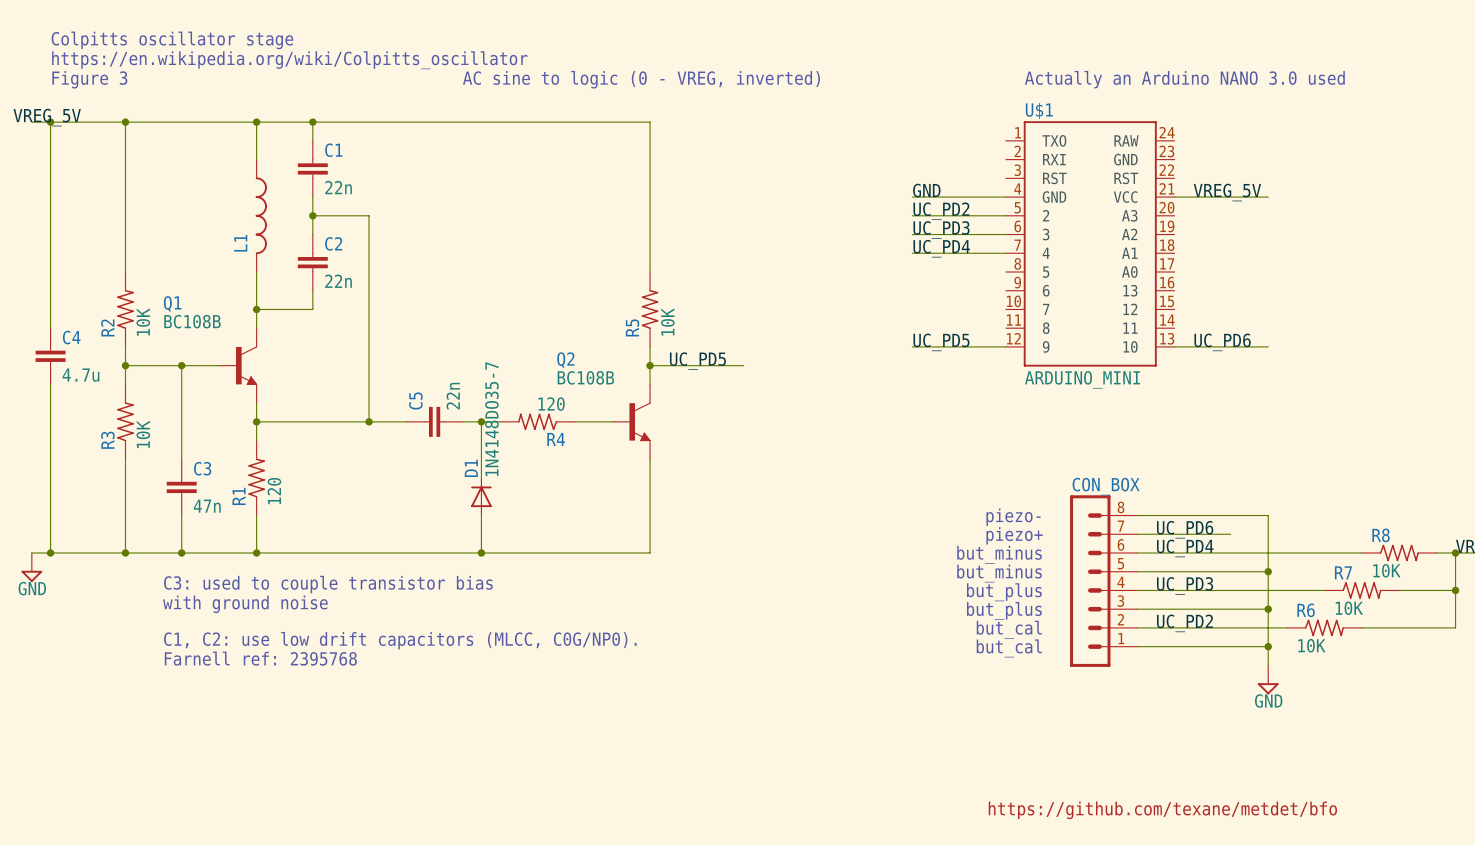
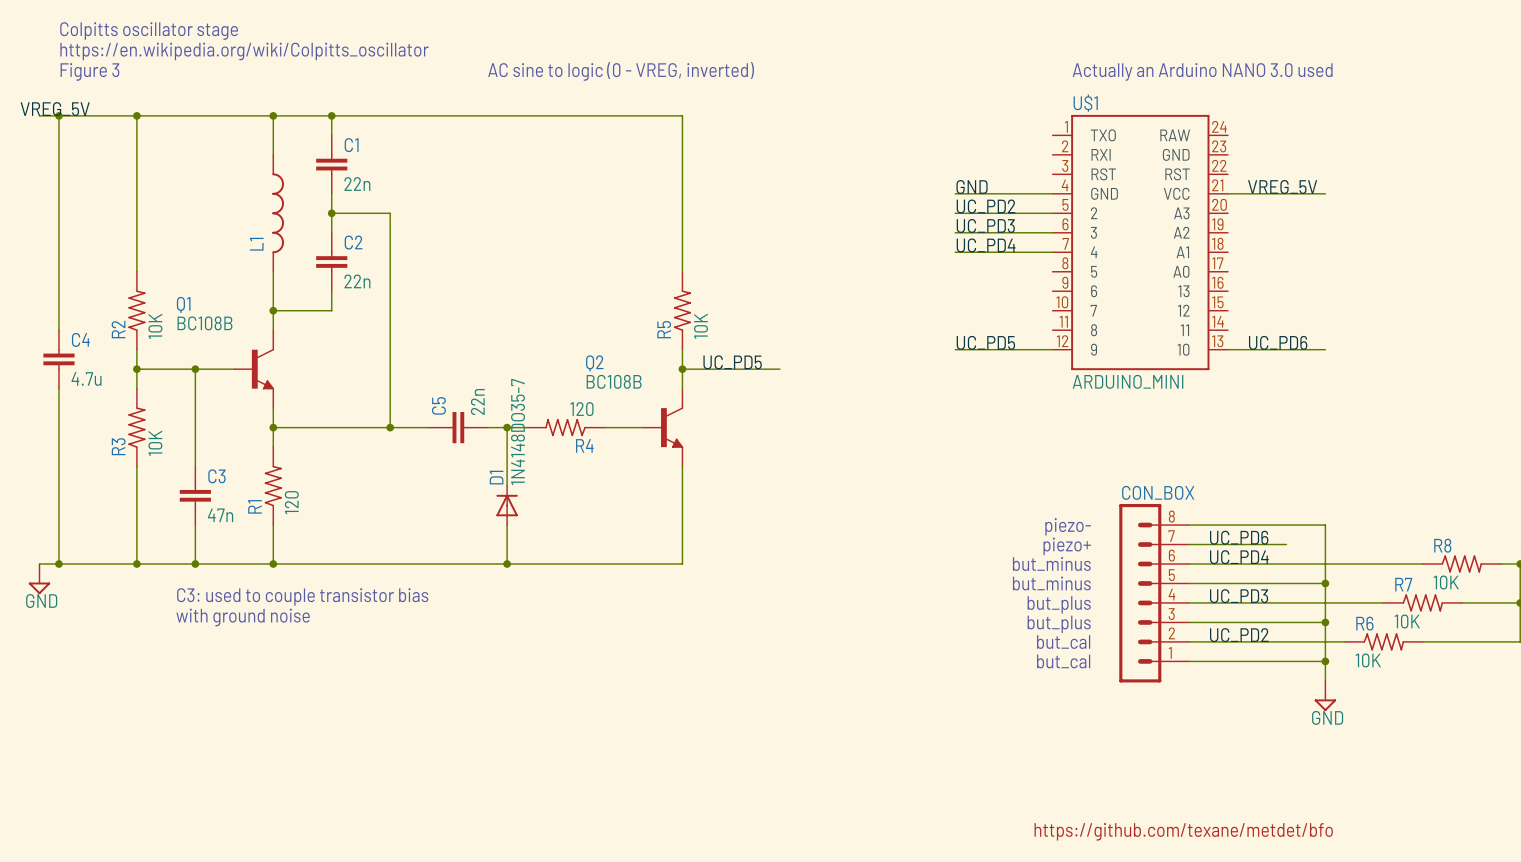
text: C1, C2: use low drift capacitors (MLCC, C0G/NP0). (400, 640) -> none
text: Farnell ref: 2395768 (260, 658) -> none

